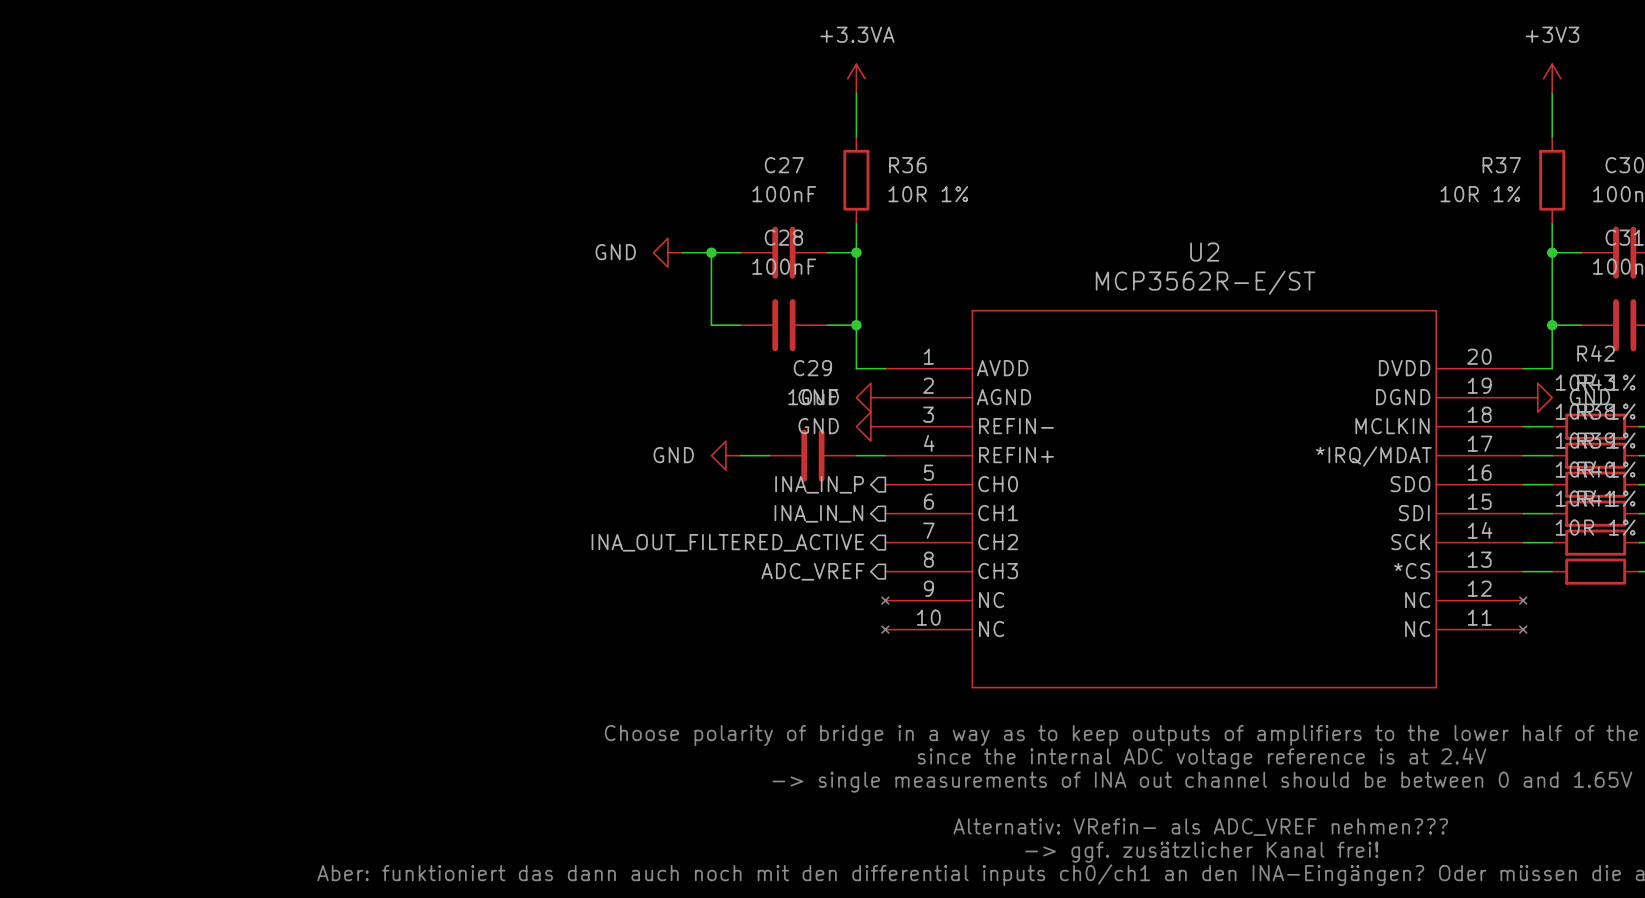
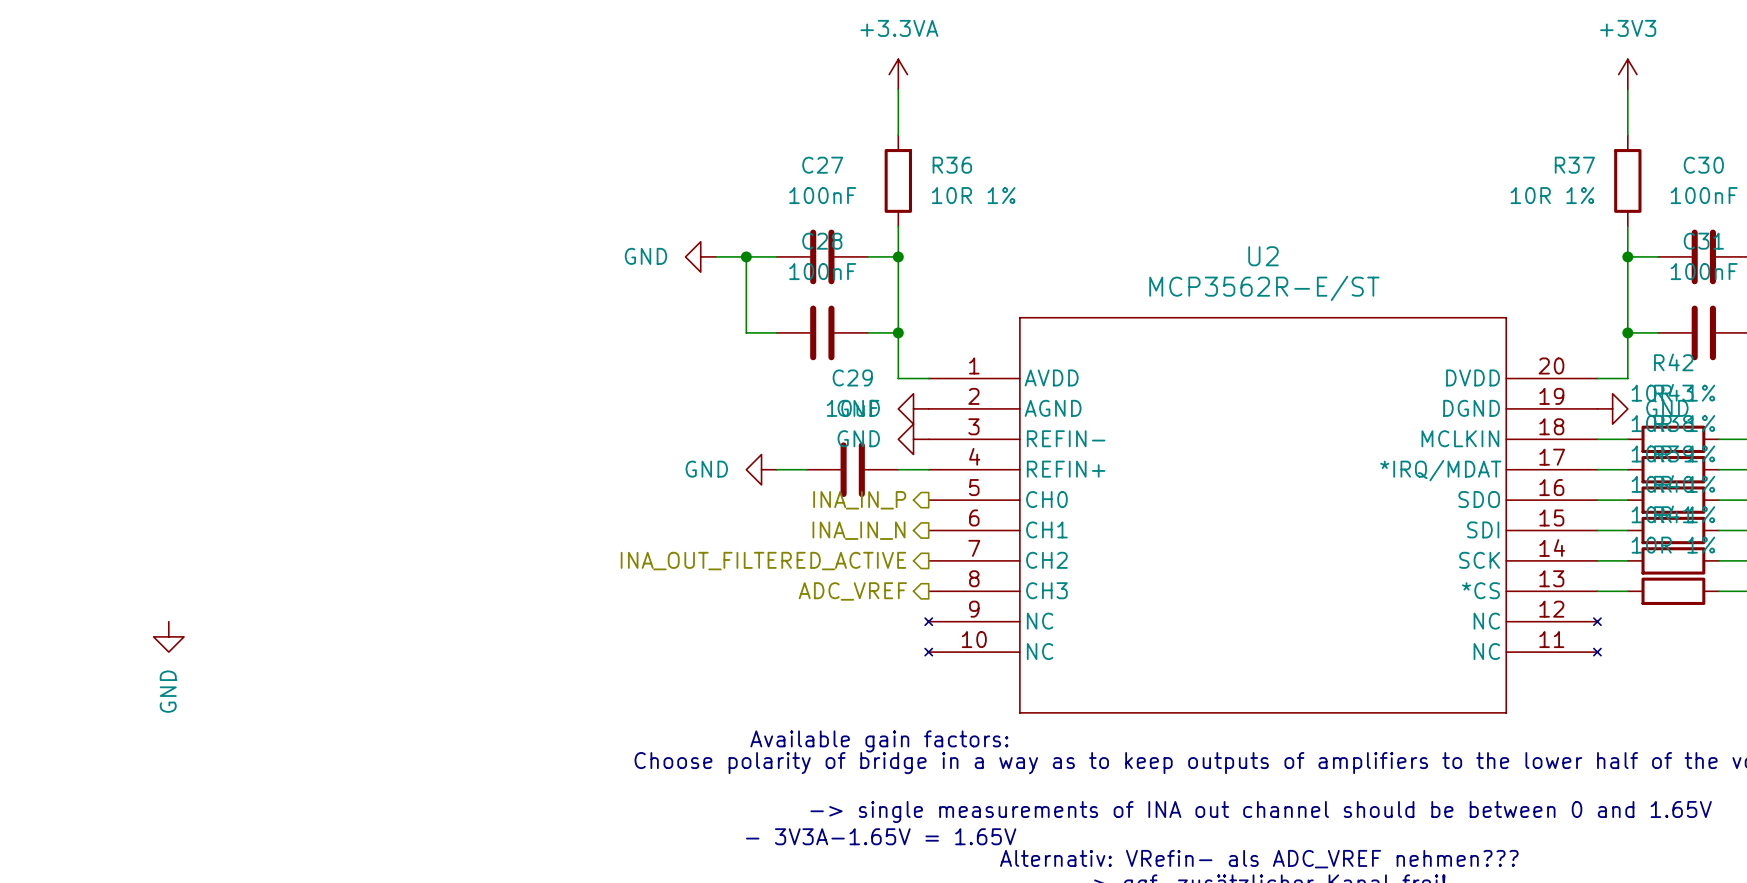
power symbol: none -> GND (168, 636)
text: none -> Available gain factors: (879, 741)
text: since the internal ADC voltage reference is at 2.4V (1202, 758) -> none
text: none -> - 3V3A-1.65V = 1.65V (881, 836)

